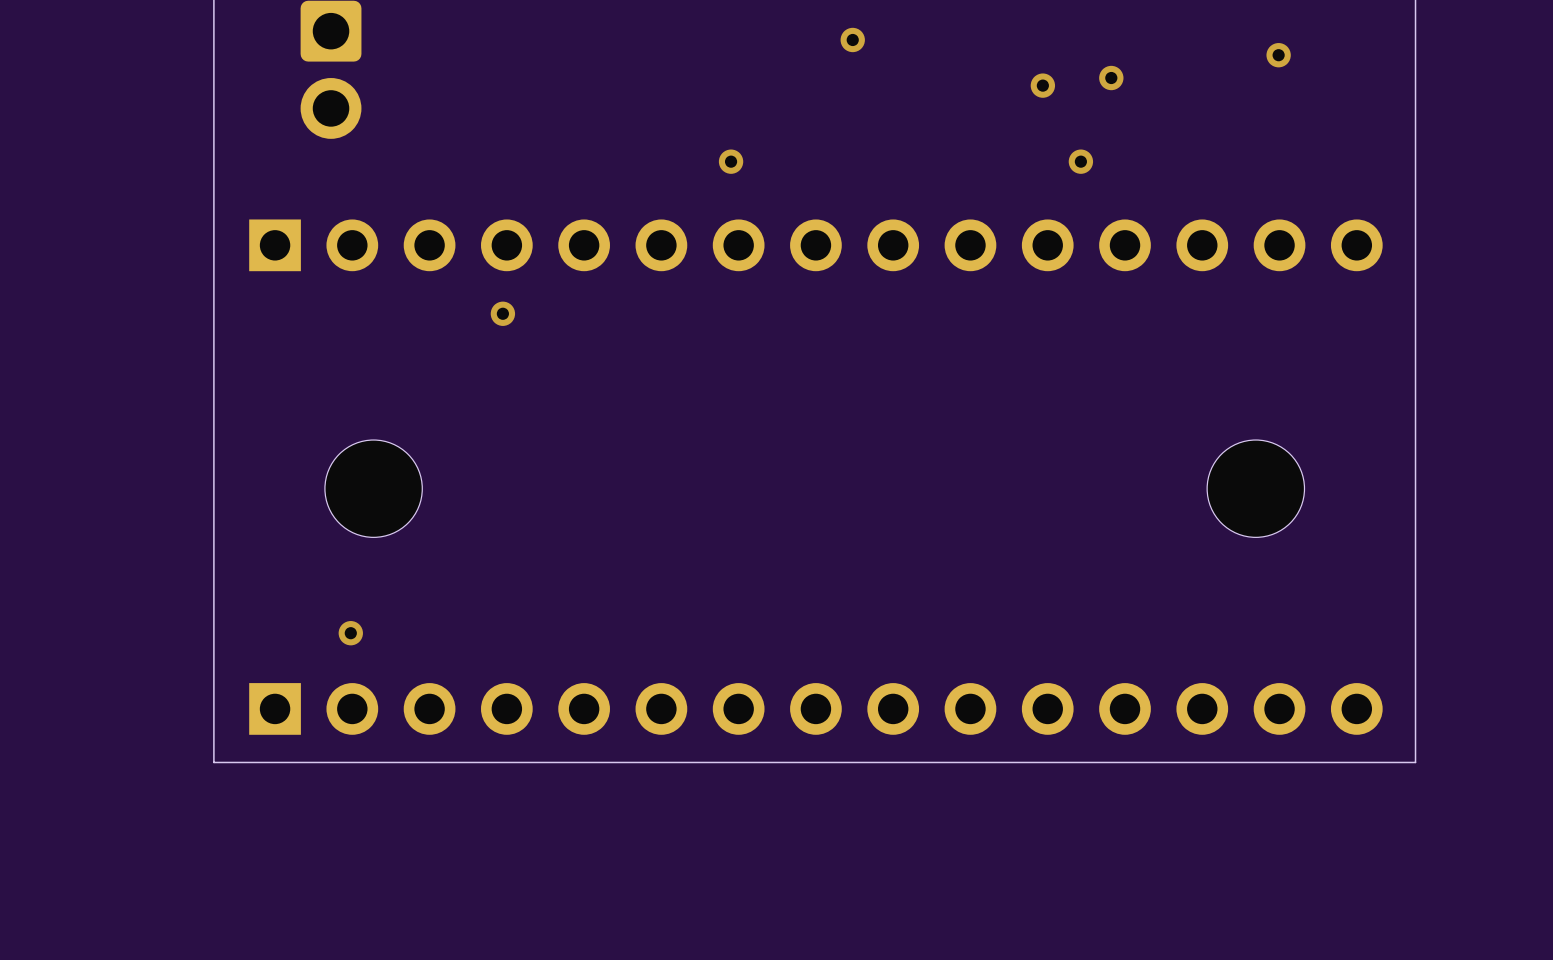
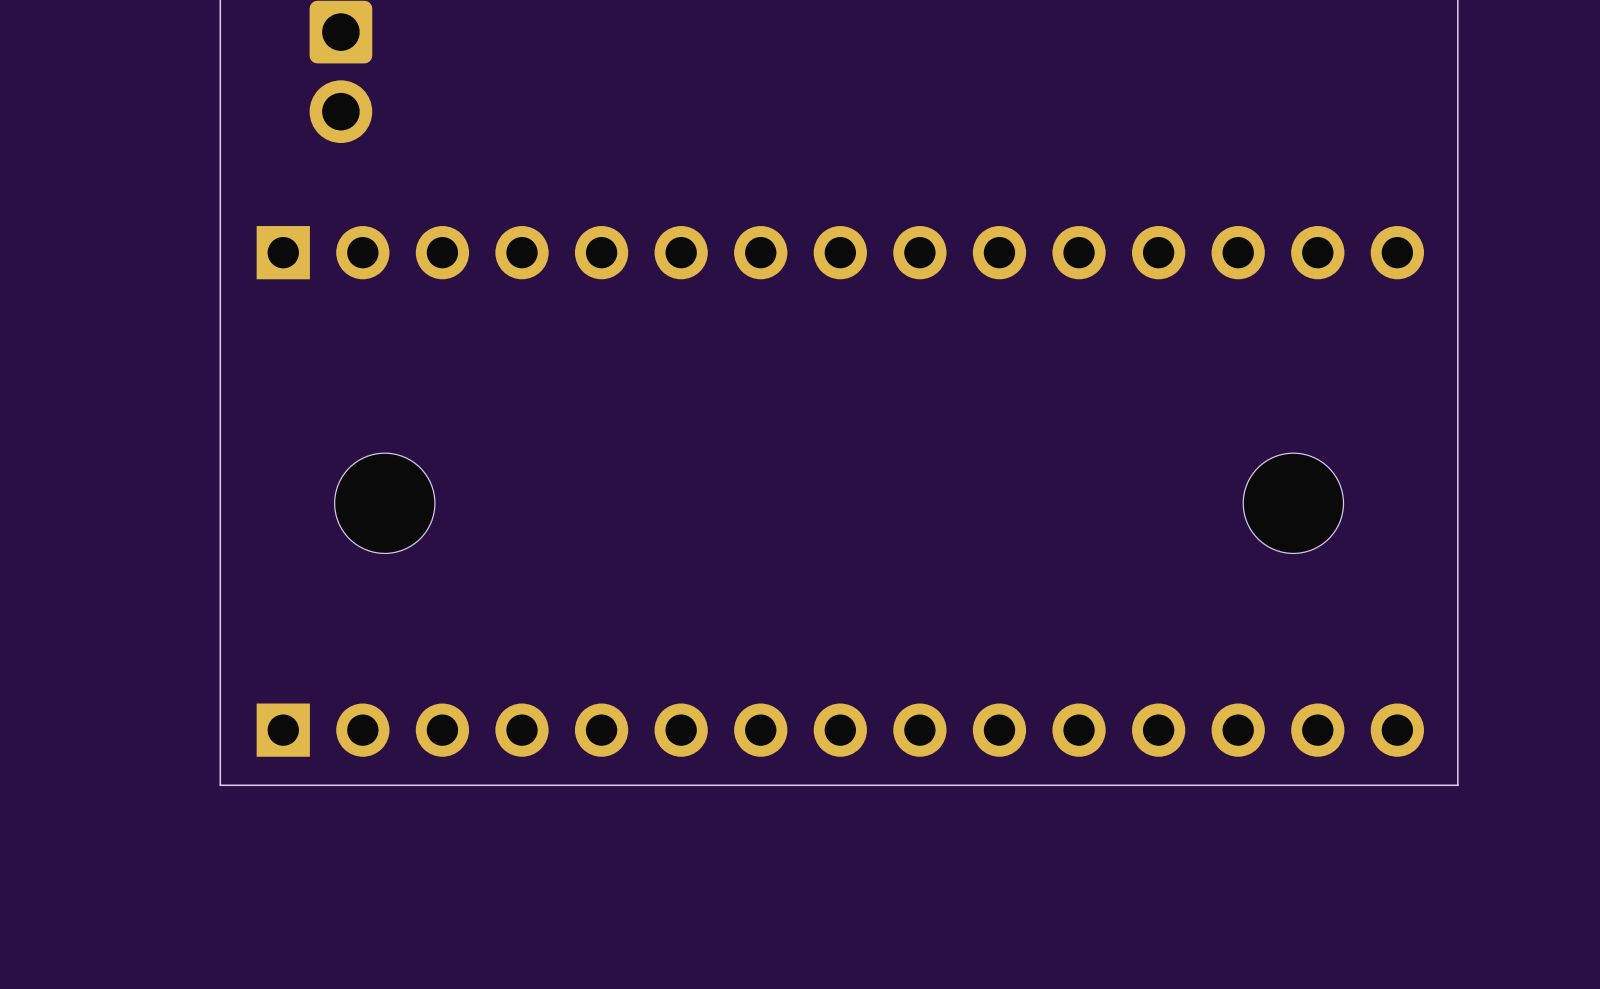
via: (852, 39) -> none
via: (1278, 55) -> none
via: (1111, 78) -> none
via: (1042, 85) -> none
via: (731, 161) -> none
via: (1080, 161) -> none
via: (502, 313) -> none
via: (350, 633) -> none

